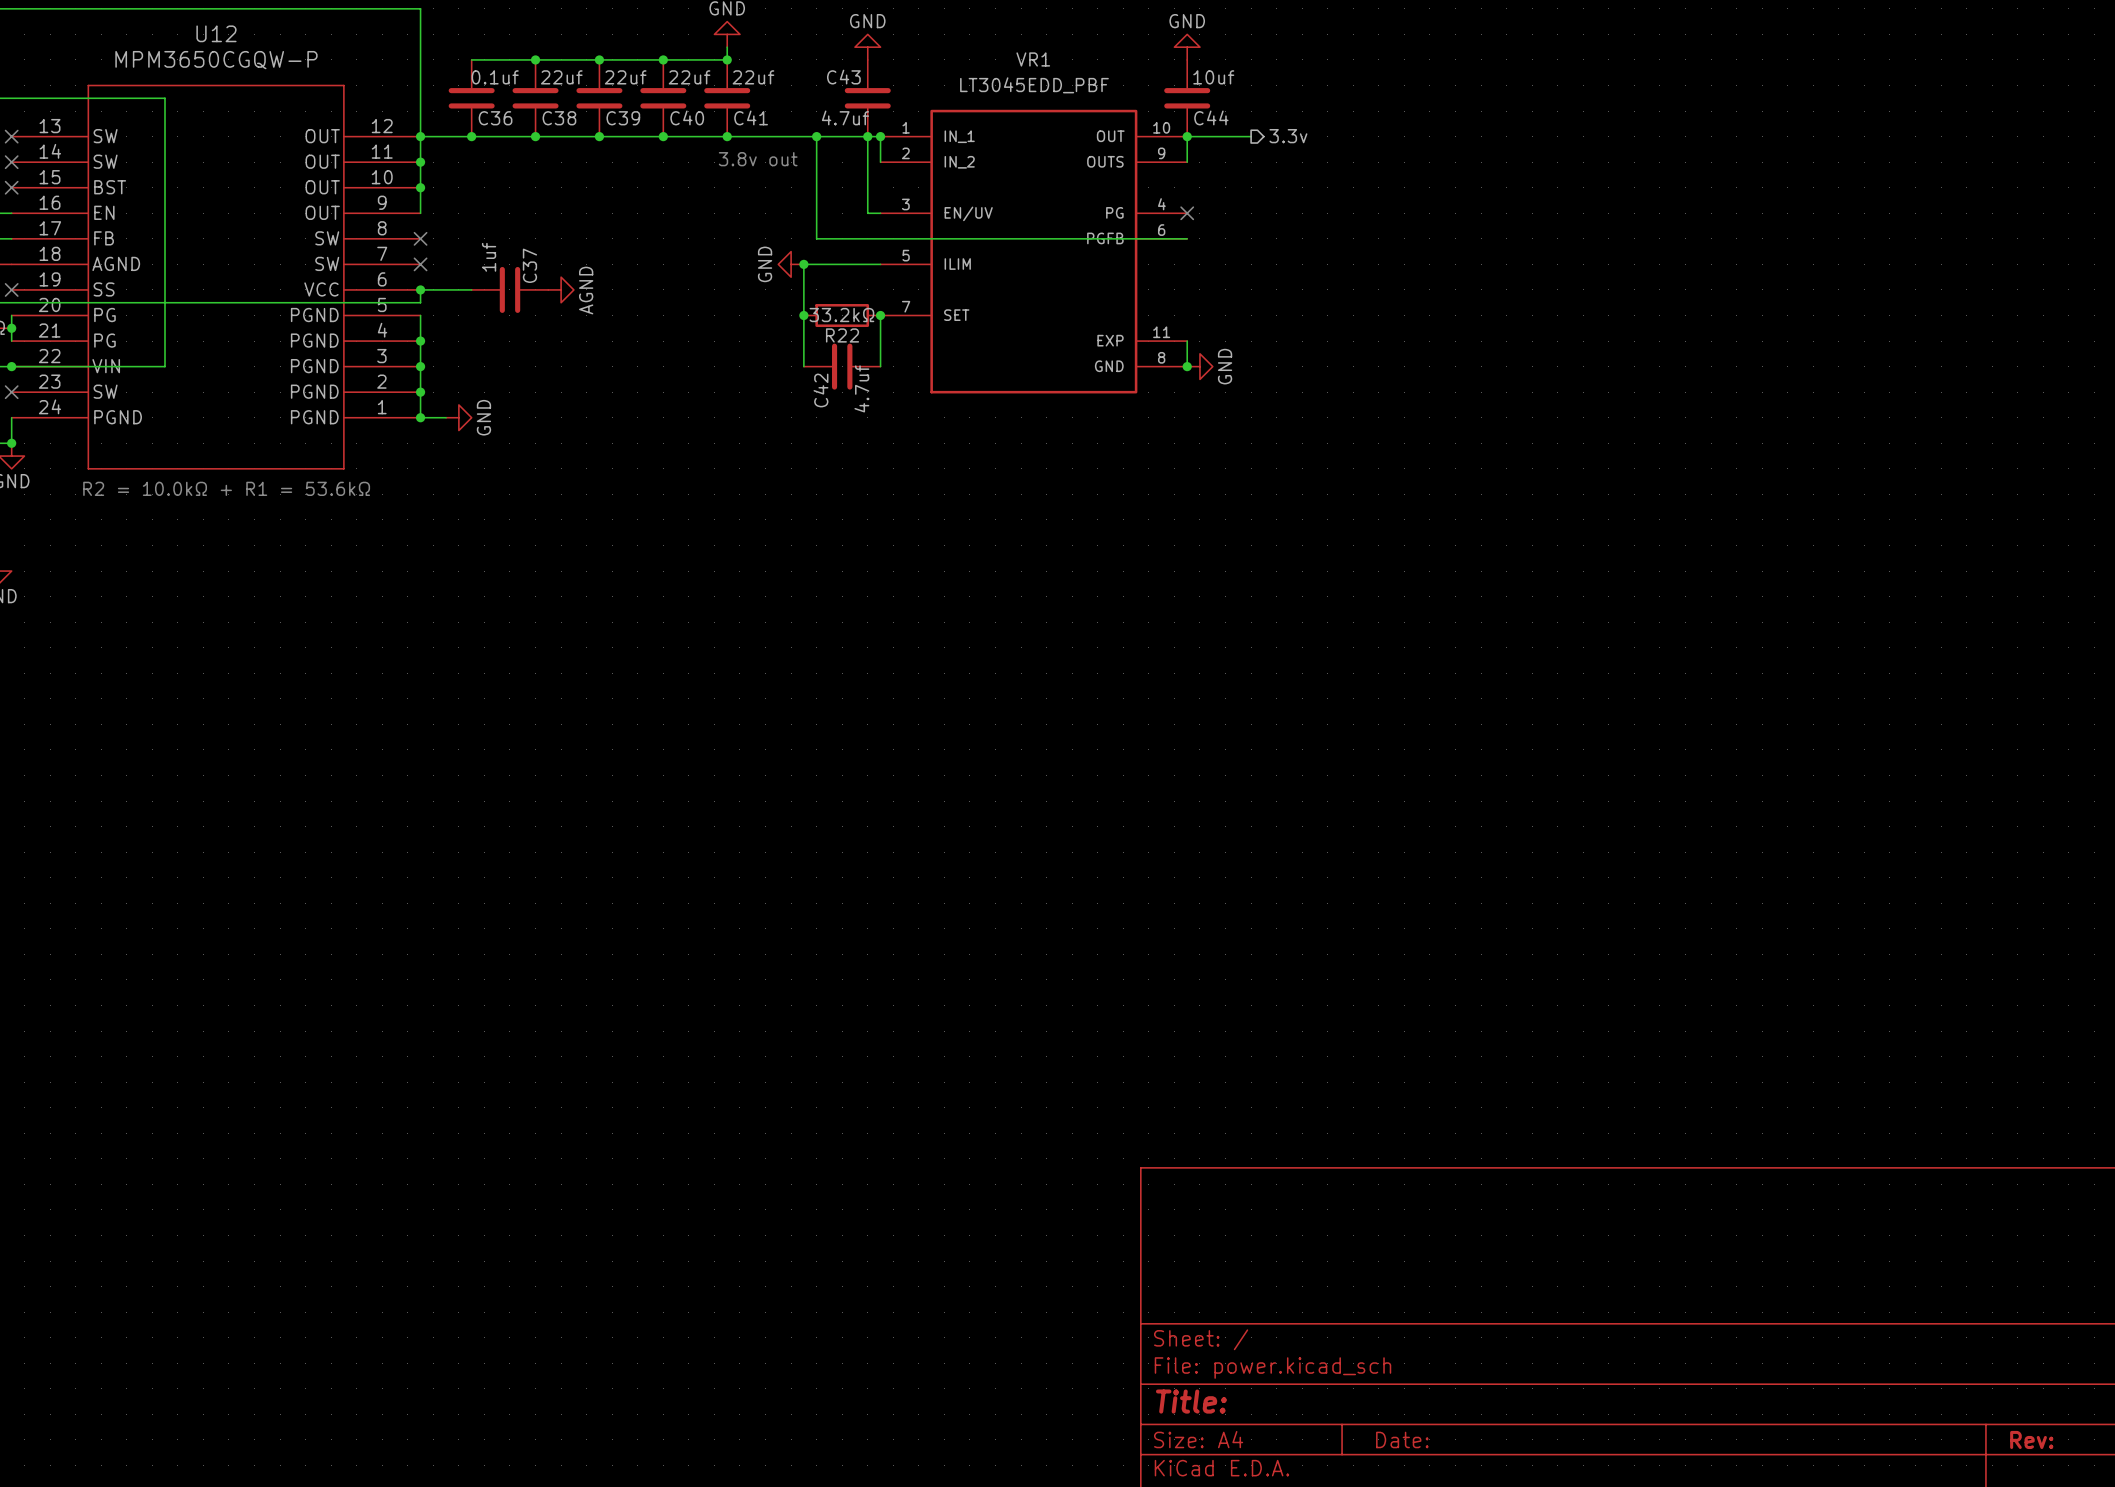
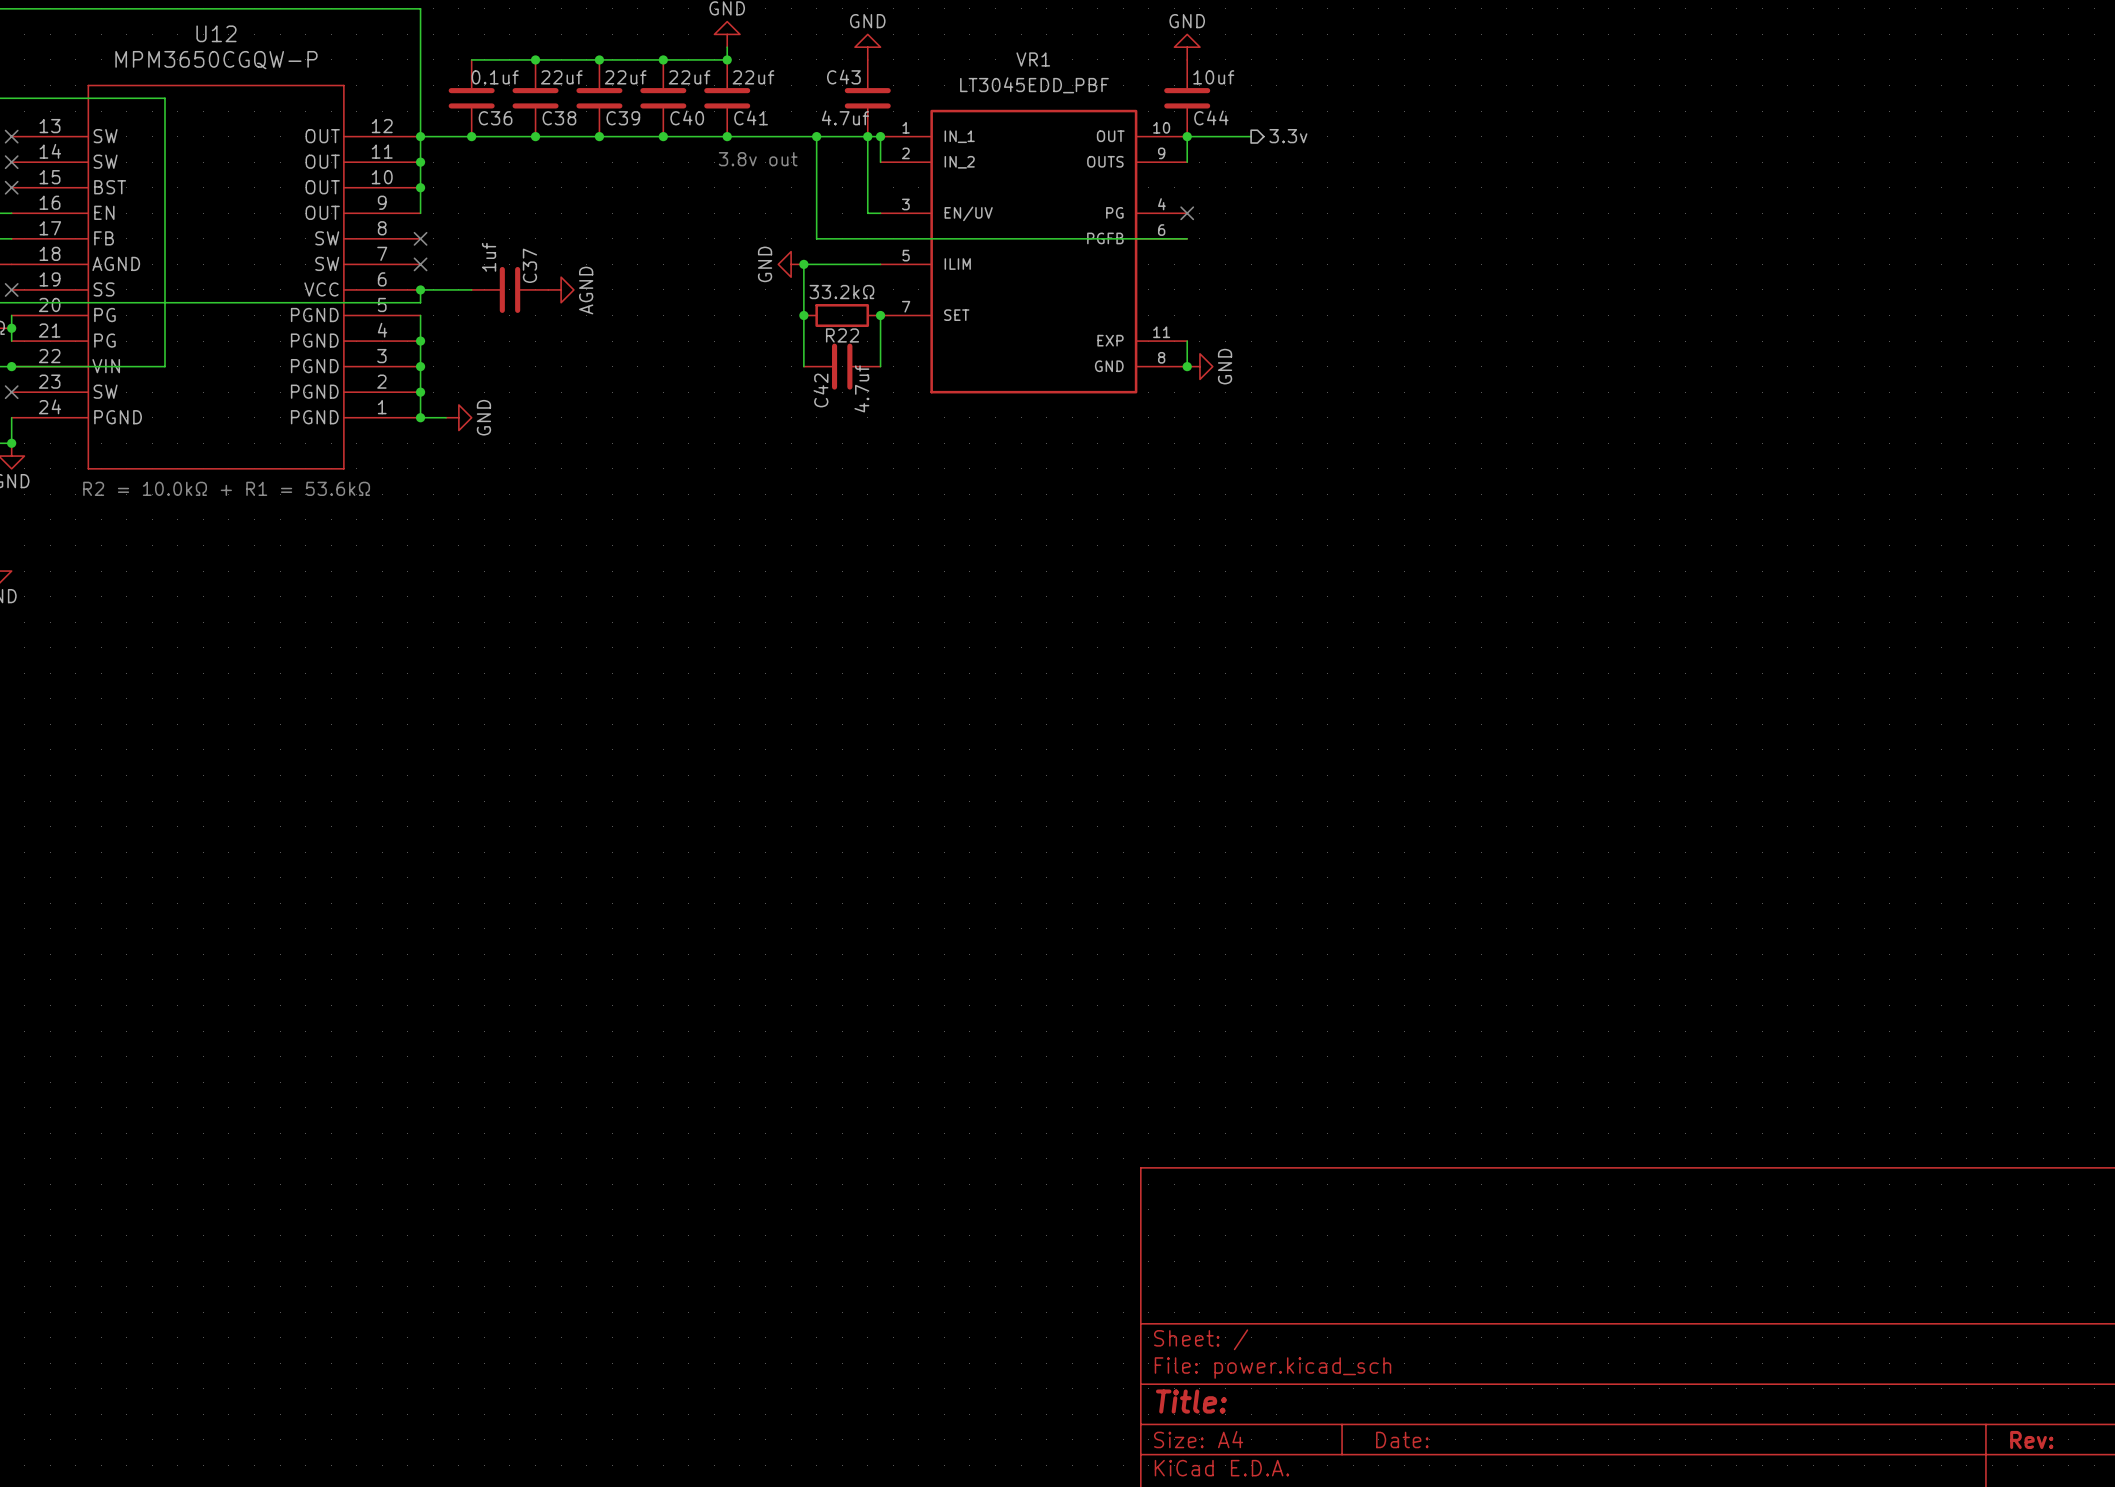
R22 value position: 33.2kΩ (841, 315) -> 33.2kΩ (841, 292)

